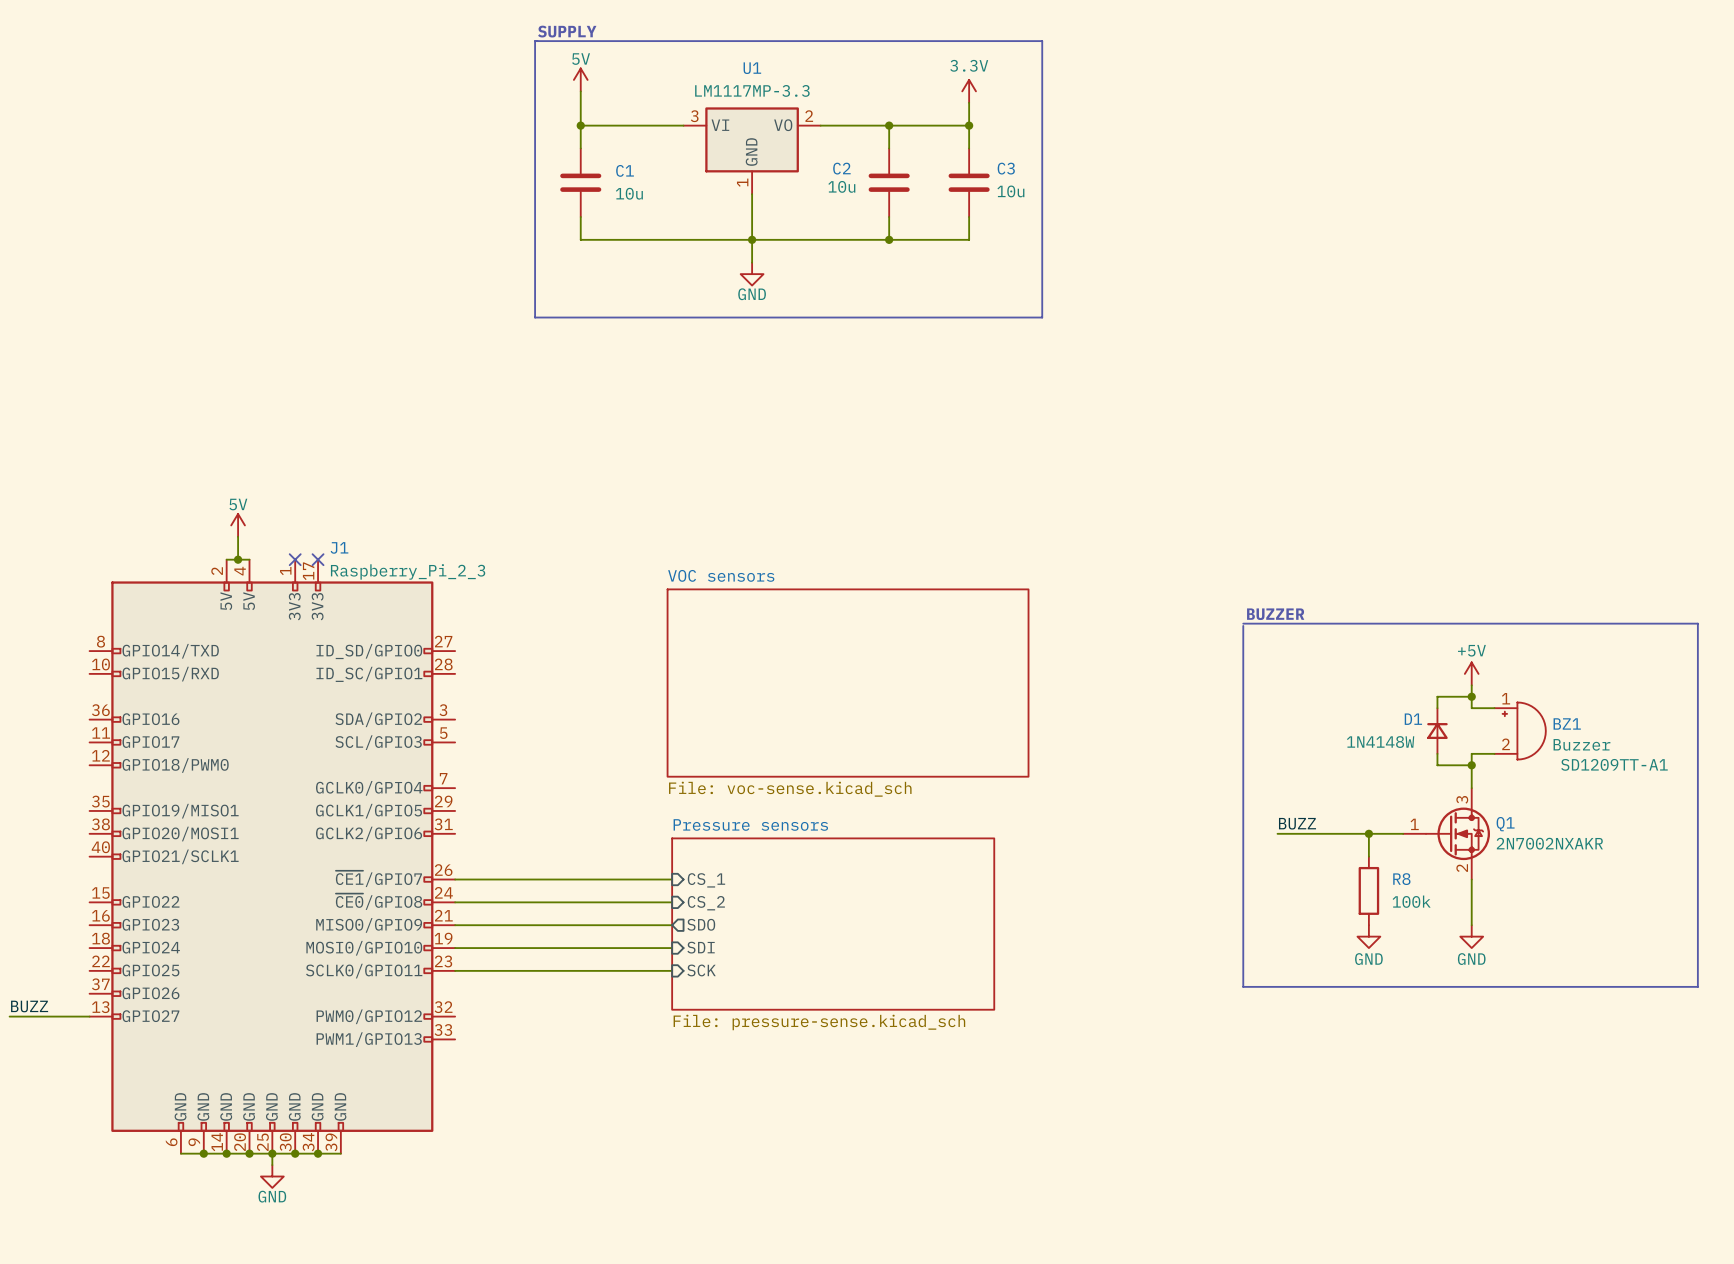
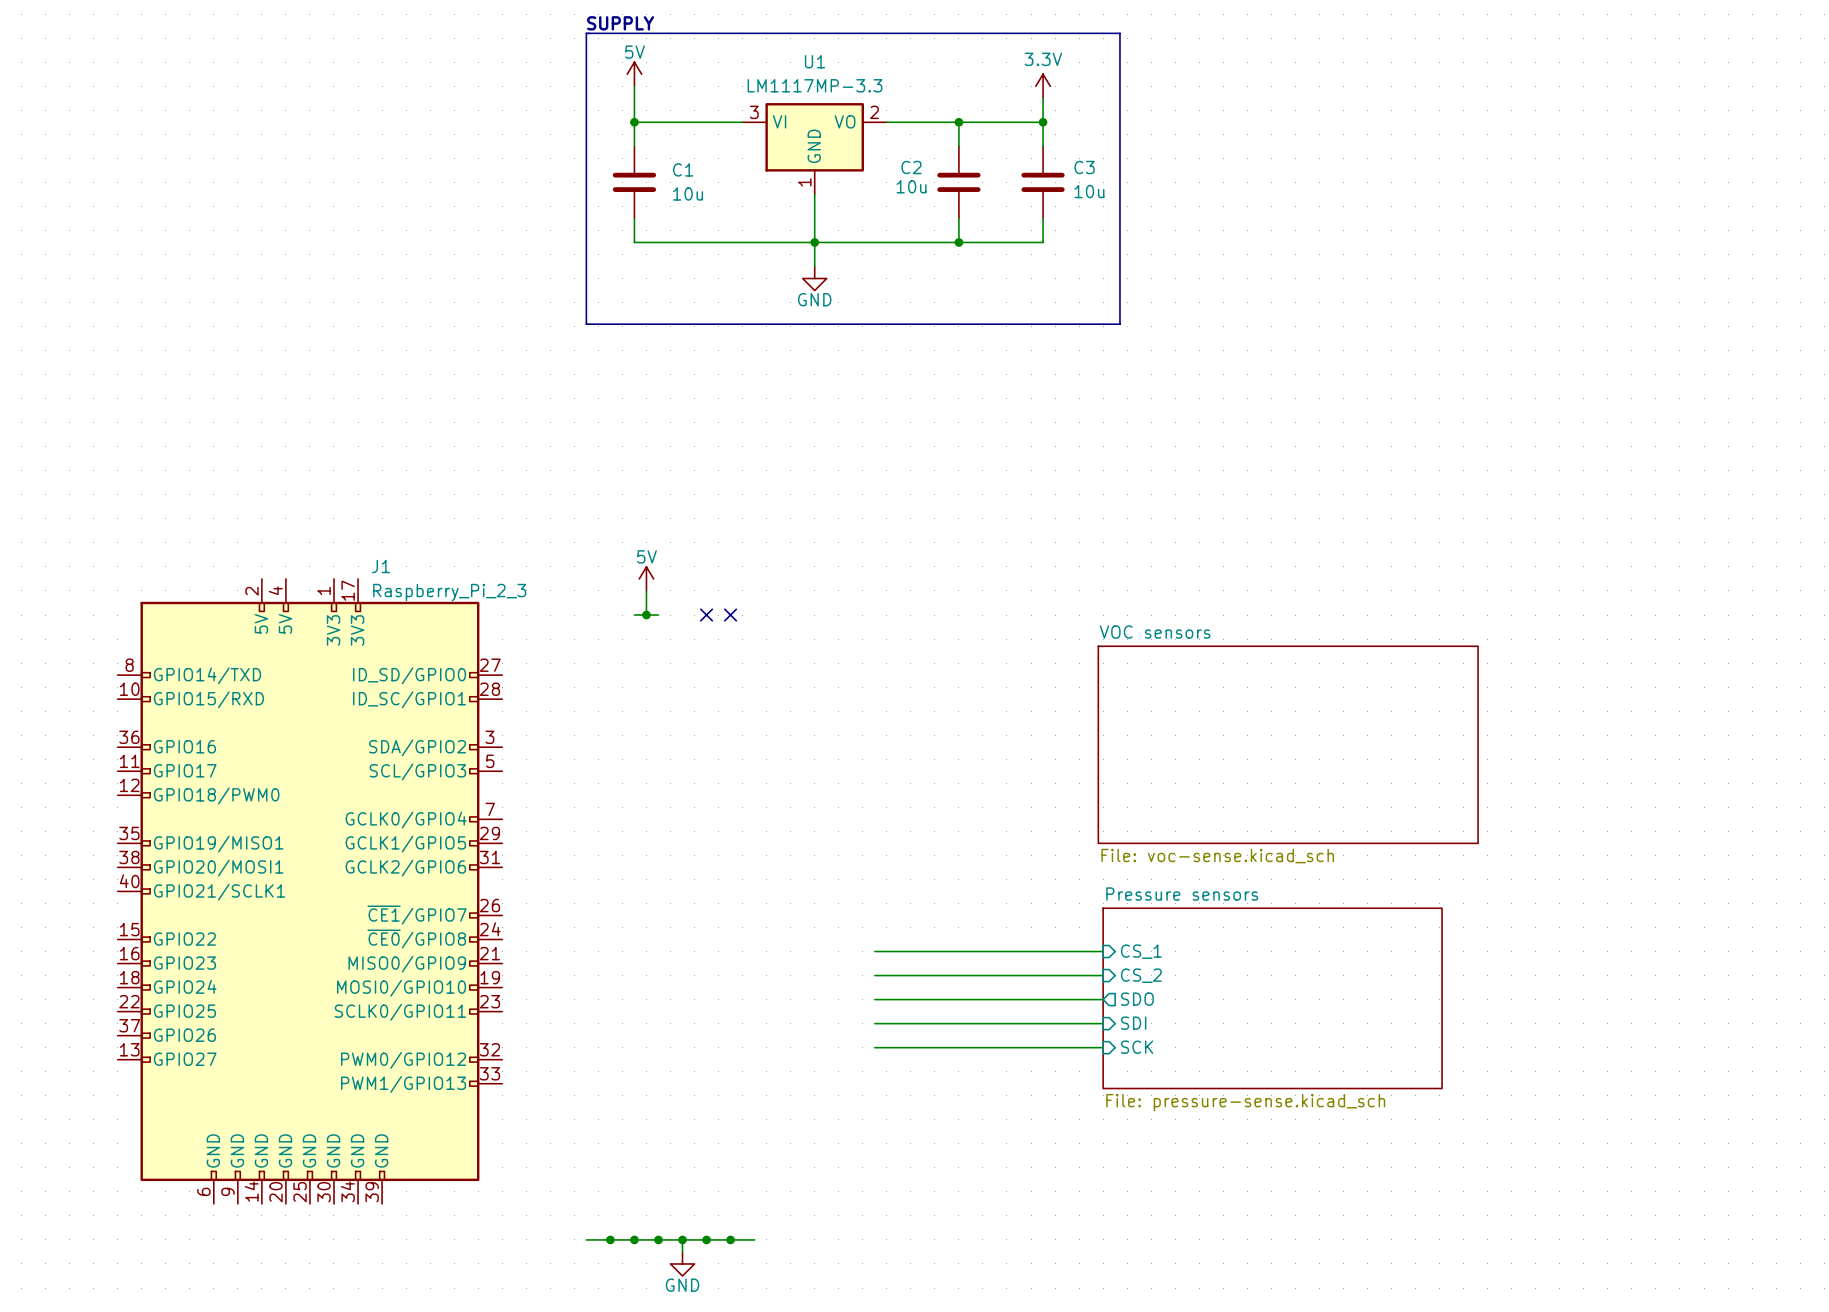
power symbol: 5V (238, 525) -> none
wire: (238, 536) (238, 559) -> none
wire: (226, 559) (249, 559) -> none
junction: (238, 559) -> none
no-connect mark: (295, 559) -> none
no-connect mark: (318, 559) -> none
power symbol: none -> 5V (646, 578)
wire: none -> (646, 590) (646, 615)
wire: none -> (634, 615) (658, 615)
junction: none -> (646, 615)
no-connect mark: none -> (706, 615)
no-connect mark: none -> (730, 615)
text: BUZZER (1275, 614) -> none
line: (1243, 623) (1697, 623) (1697, 986) (1243, 986) (1243, 625) -> none
power symbol: +5V (1471, 673) -> none
sheet VOC sensors: File: voc-sense.kicad_sch (848, 683) -> none
wire: (1471, 685) (1471, 708) (1494, 708) -> none
wire: (1471, 696) (1437, 696) (1437, 708) -> none
junction: (1471, 696) -> none
sheet VOC sensors: none -> File: voc-sense.kicad_sch (1288, 744)
D1: 1N4148W (1437, 731) -> none
BZ1: Buzzer (1520, 731) -> none
wire: (1437, 753) (1437, 765) (1471, 765) -> none
wire: (1494, 753) (1471, 753) (1471, 788) -> none
junction: (1471, 765) -> none
label: BUZZ (1297, 823) -> none
wire: (1277, 833) (1403, 833) -> none
wire: (1368, 833) (1368, 856) -> none
junction: (1368, 833) -> none
Q1: 2N7002NXAKR (1446, 833) -> none
wire: (455, 879) (672, 879) -> none
wire: (1471, 879) (1471, 925) -> none
sheet pin: CS_1 (706, 880) -> none
R8: 100k (1368, 890) -> none
wire: (455, 902) (672, 902) -> none
sheet pin: CS_2 (706, 903) -> none
wire: none -> (874, 951) (1103, 951)
sheet pin: none -> CS_1 (1141, 951)
sheet pin: SDO (701, 924) -> none
sheet Pressure sensors: File: pressure-sense.kicad_sch (833, 924) -> none
wire: (455, 925) (672, 925) -> none
wire: none -> (874, 975) (1103, 975)
power symbol: GND (1368, 936) -> none
power symbol: GND (1471, 936) -> none
sheet pin: none -> CS_2 (1141, 975)
sheet pin: SDI (701, 947) -> none
wire: (455, 948) (672, 948) -> none
sheet Pressure sensors: none -> File: pressure-sense.kicad_sch (1272, 998)
wire: none -> (874, 999) (1103, 999)
sheet pin: none -> SDO (1137, 999)
wire: (455, 970) (672, 970) -> none
sheet pin: SCK (701, 970) -> none
sheet pin: none -> SDI (1133, 1023)
wire: none -> (874, 1023) (1103, 1023)
sheet pin: none -> SCK (1137, 1047)
wire: none -> (874, 1047) (1103, 1047)
label: BUZZ (29, 1006) -> none
wire: (9, 1016) (89, 1016) -> none
wire: (180, 1153) (340, 1153) -> none
junction: (203, 1153) -> none
junction: (226, 1153) -> none
junction: (249, 1153) -> none
wire: (272, 1153) (272, 1165) -> none
junction: (272, 1153) -> none
junction: (295, 1153) -> none
junction: (318, 1153) -> none
power symbol: GND (272, 1176) -> none
wire: none -> (586, 1239) (754, 1239)
junction: none -> (610, 1239)
junction: none -> (634, 1239)
junction: none -> (658, 1239)
wire: none -> (682, 1239) (682, 1251)
junction: none -> (682, 1239)
junction: none -> (706, 1239)
junction: none -> (730, 1239)
power symbol: none -> GND (682, 1263)

